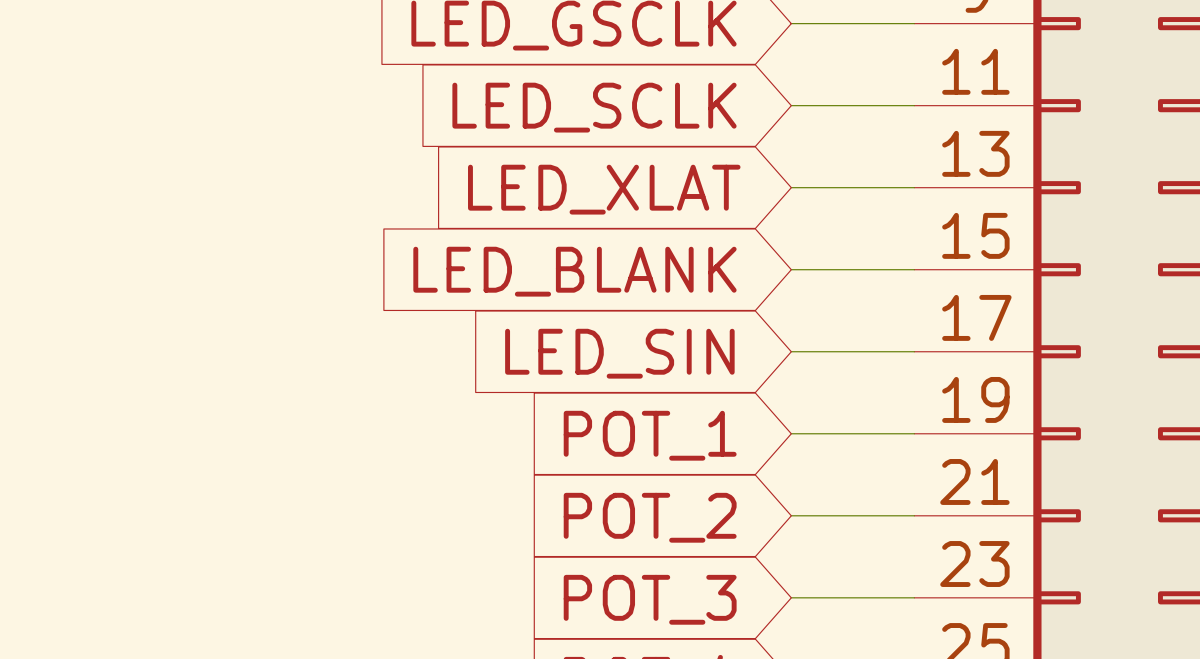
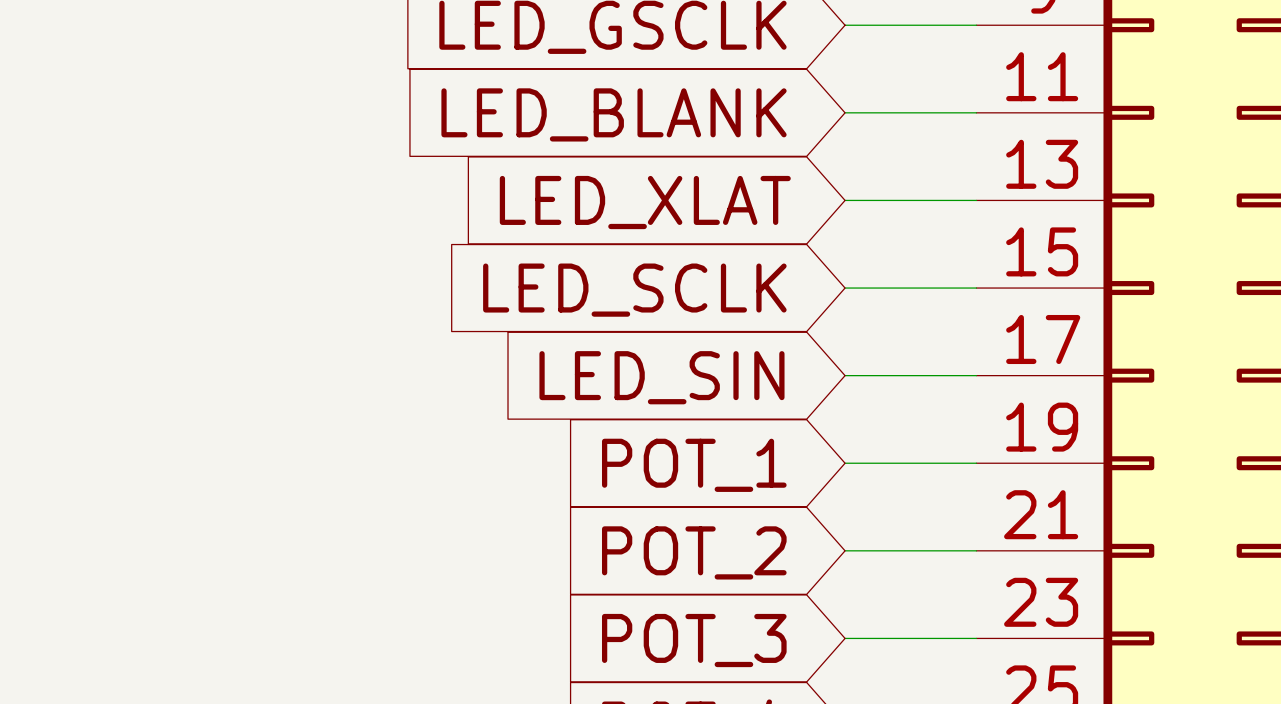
global label: LED_SCLK (594, 107) -> LED_BLANK (614, 114)
global label: LED_BLANK (574, 271) -> LED_SCLK (634, 290)

